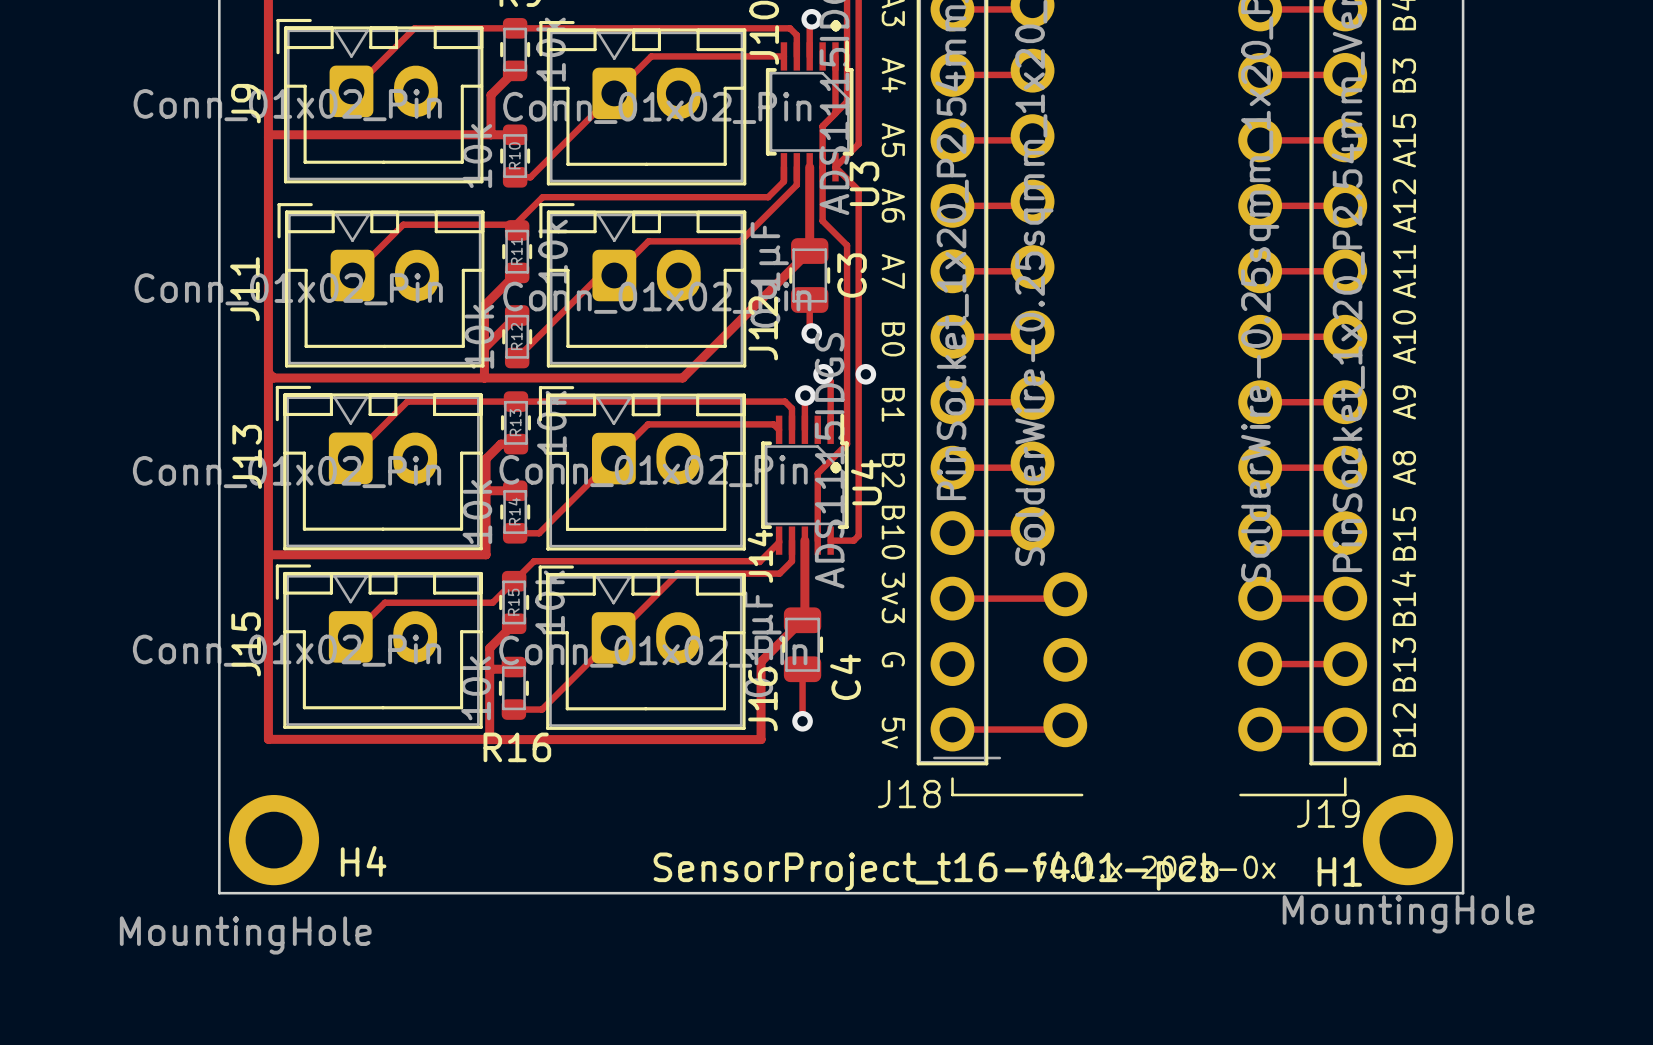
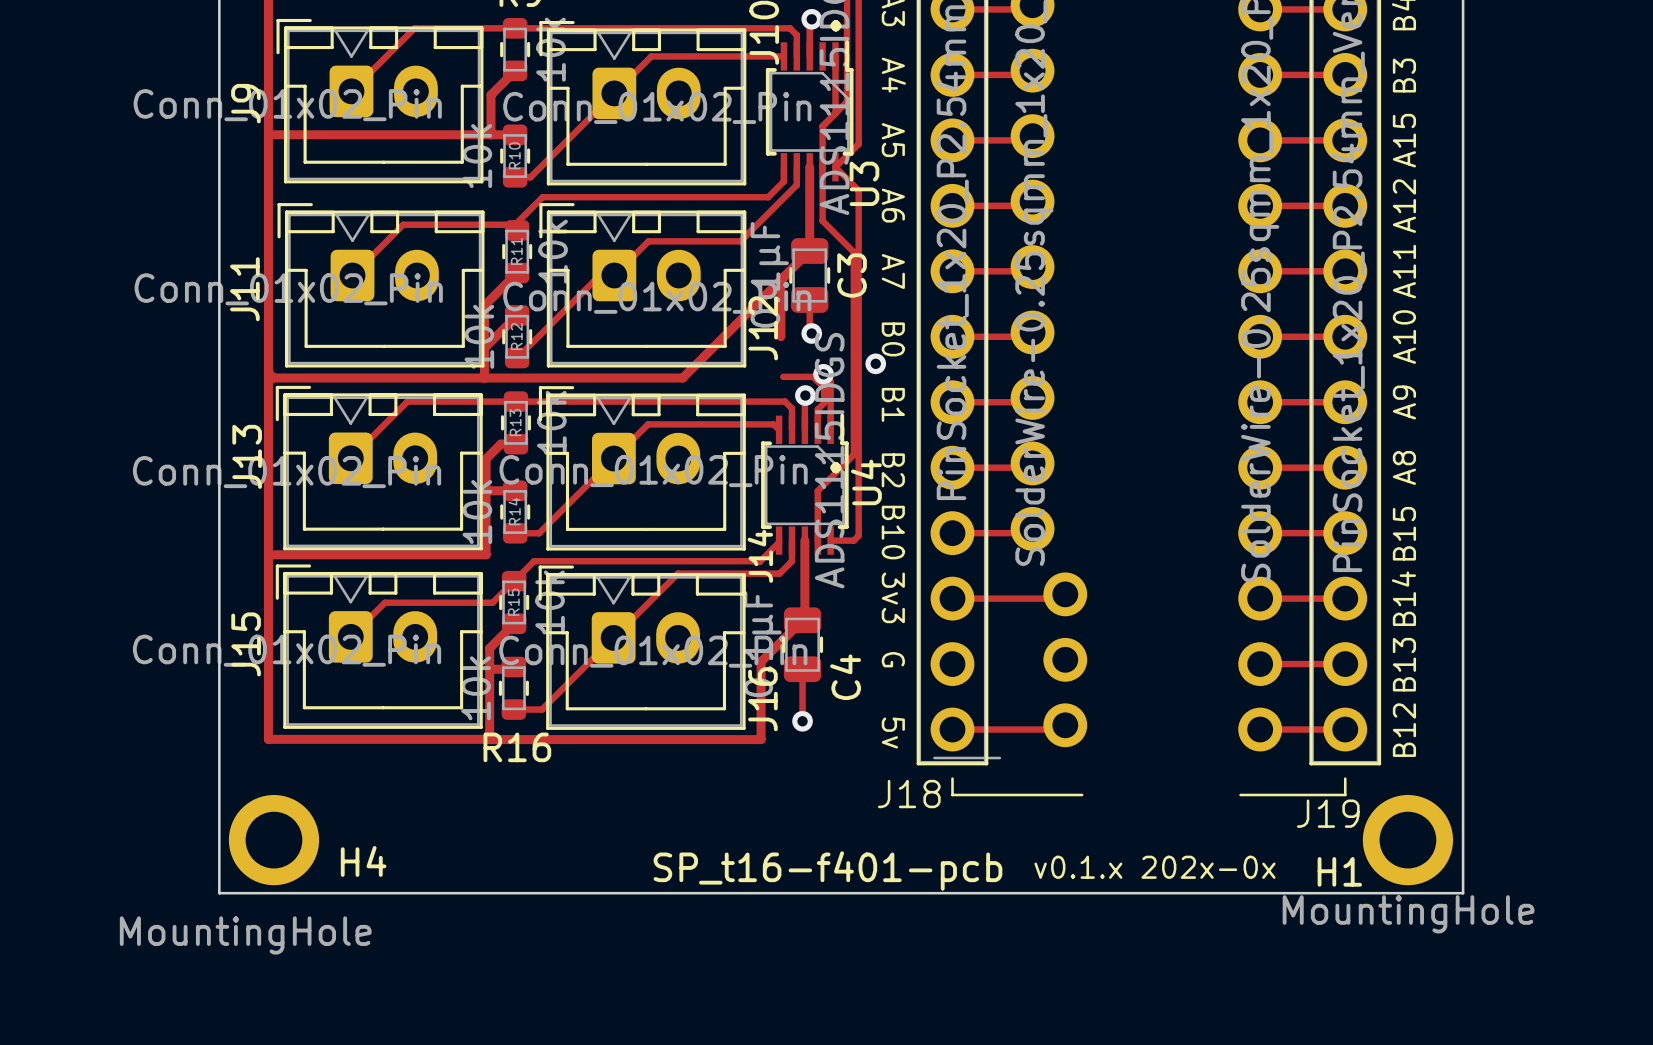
track: (847, 245) (847, 444) (817, 473) (817, 490) -> (847, 245) (853, 252) (853, 454) (817, 490)
track: none -> (780, 279) (780, 336)
via position: (865, 374) -> (875, 363)
track: none -> (783, 376) (813, 376) (824, 387) (824, 403) (817, 409) (817, 429)
text: SensorProject_t16-f401-pcb (935, 871) -> SP_t16-f401-pcb (827, 871)

